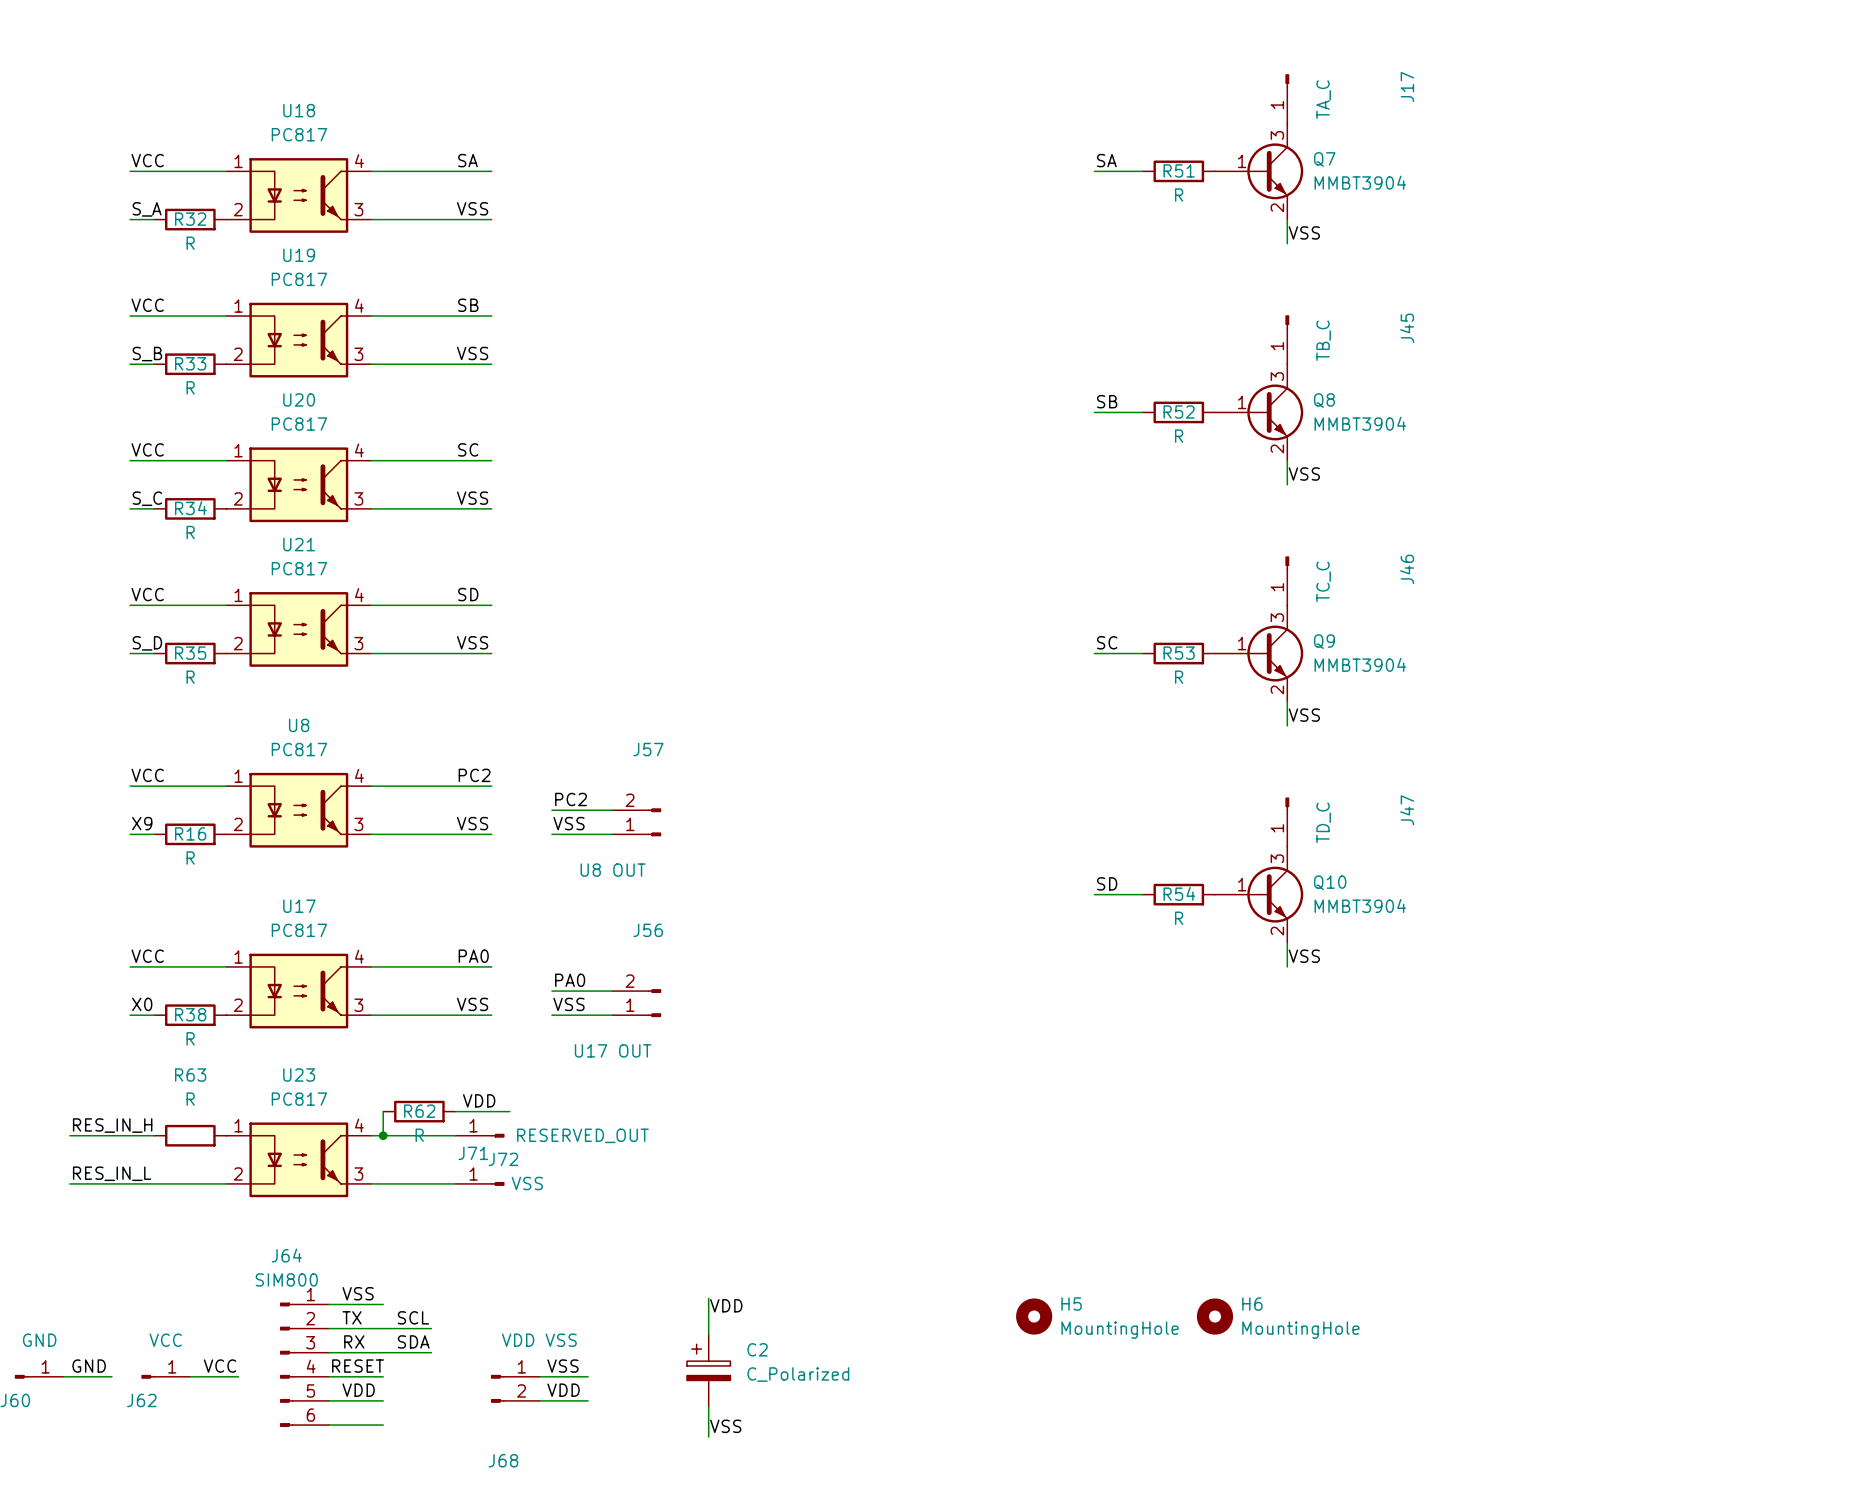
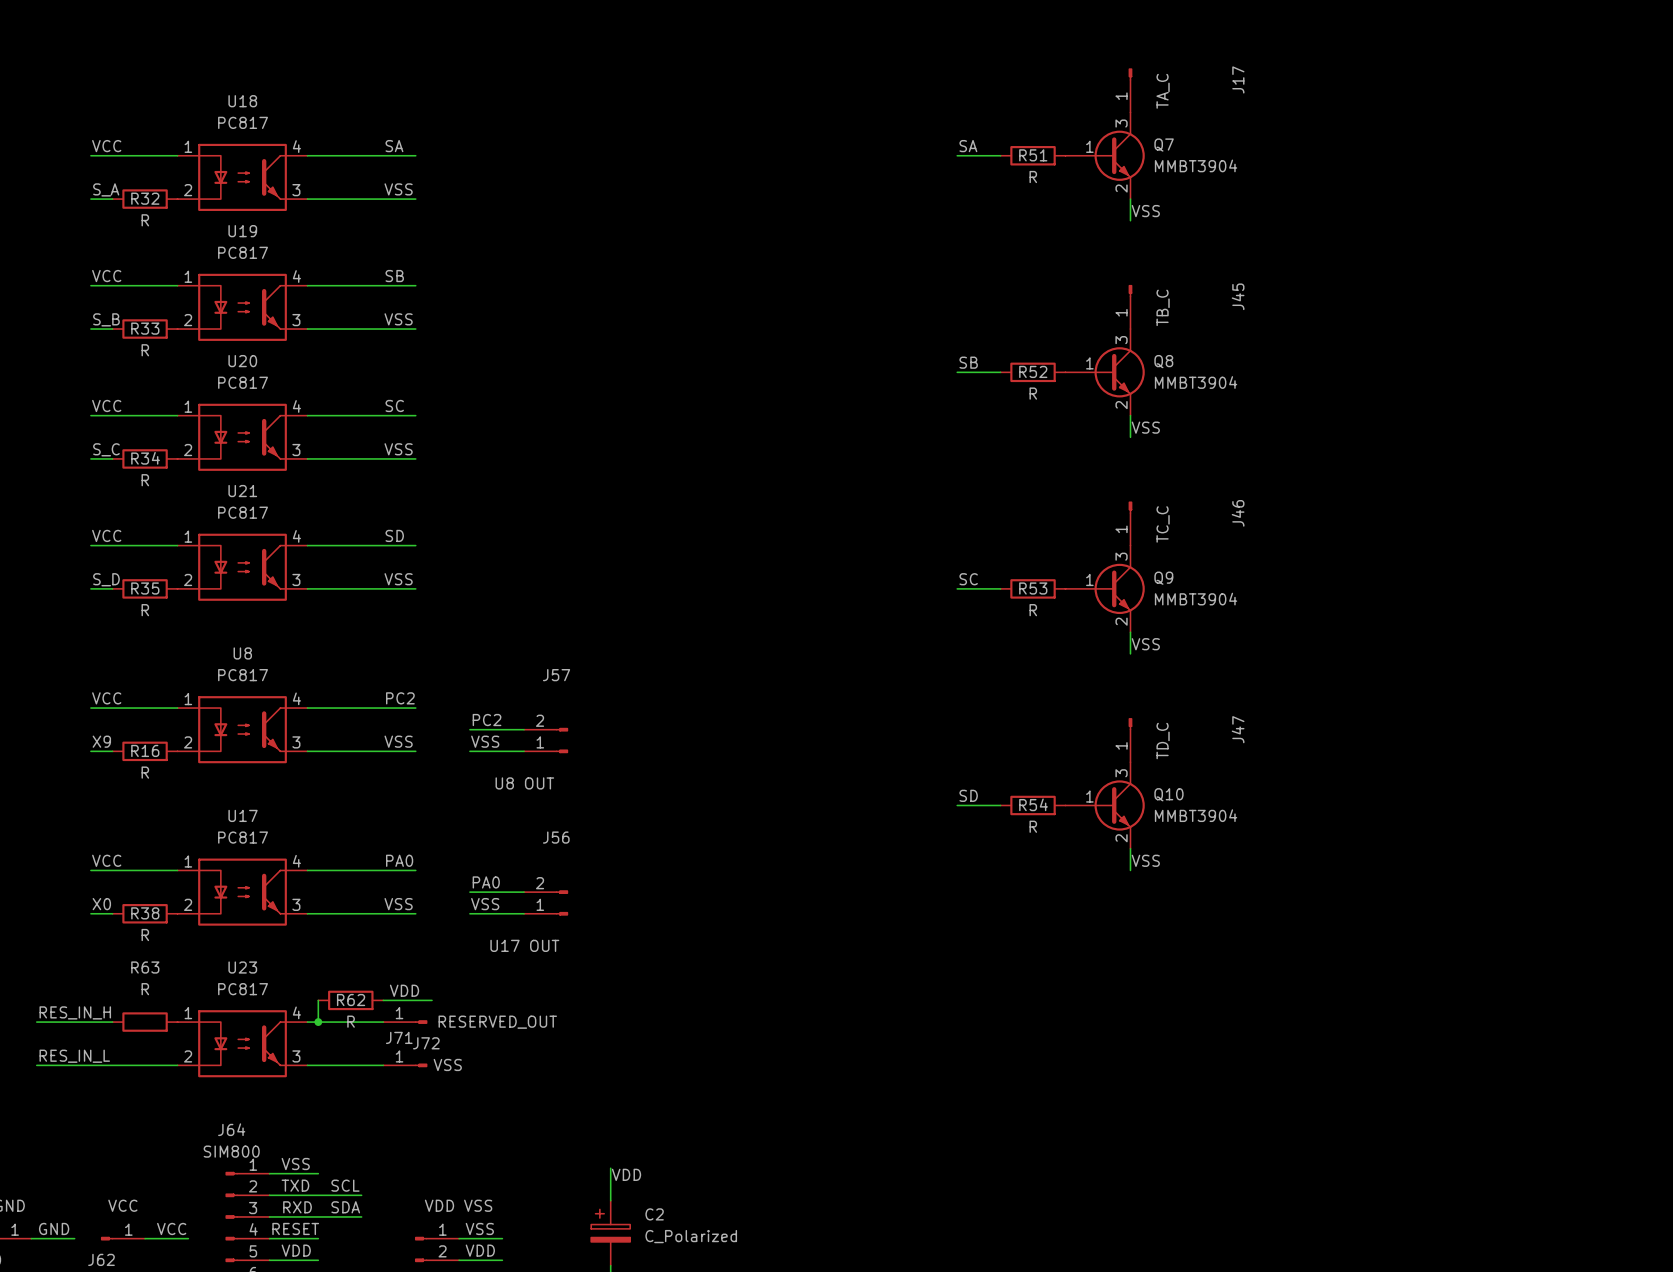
H5: MountingHole (1034, 1316) -> none
H6: MountingHole (1214, 1316) -> none
label: TX (352, 1317) -> TXD (295, 1185)
label: RX (354, 1341) -> RXD (297, 1207)

